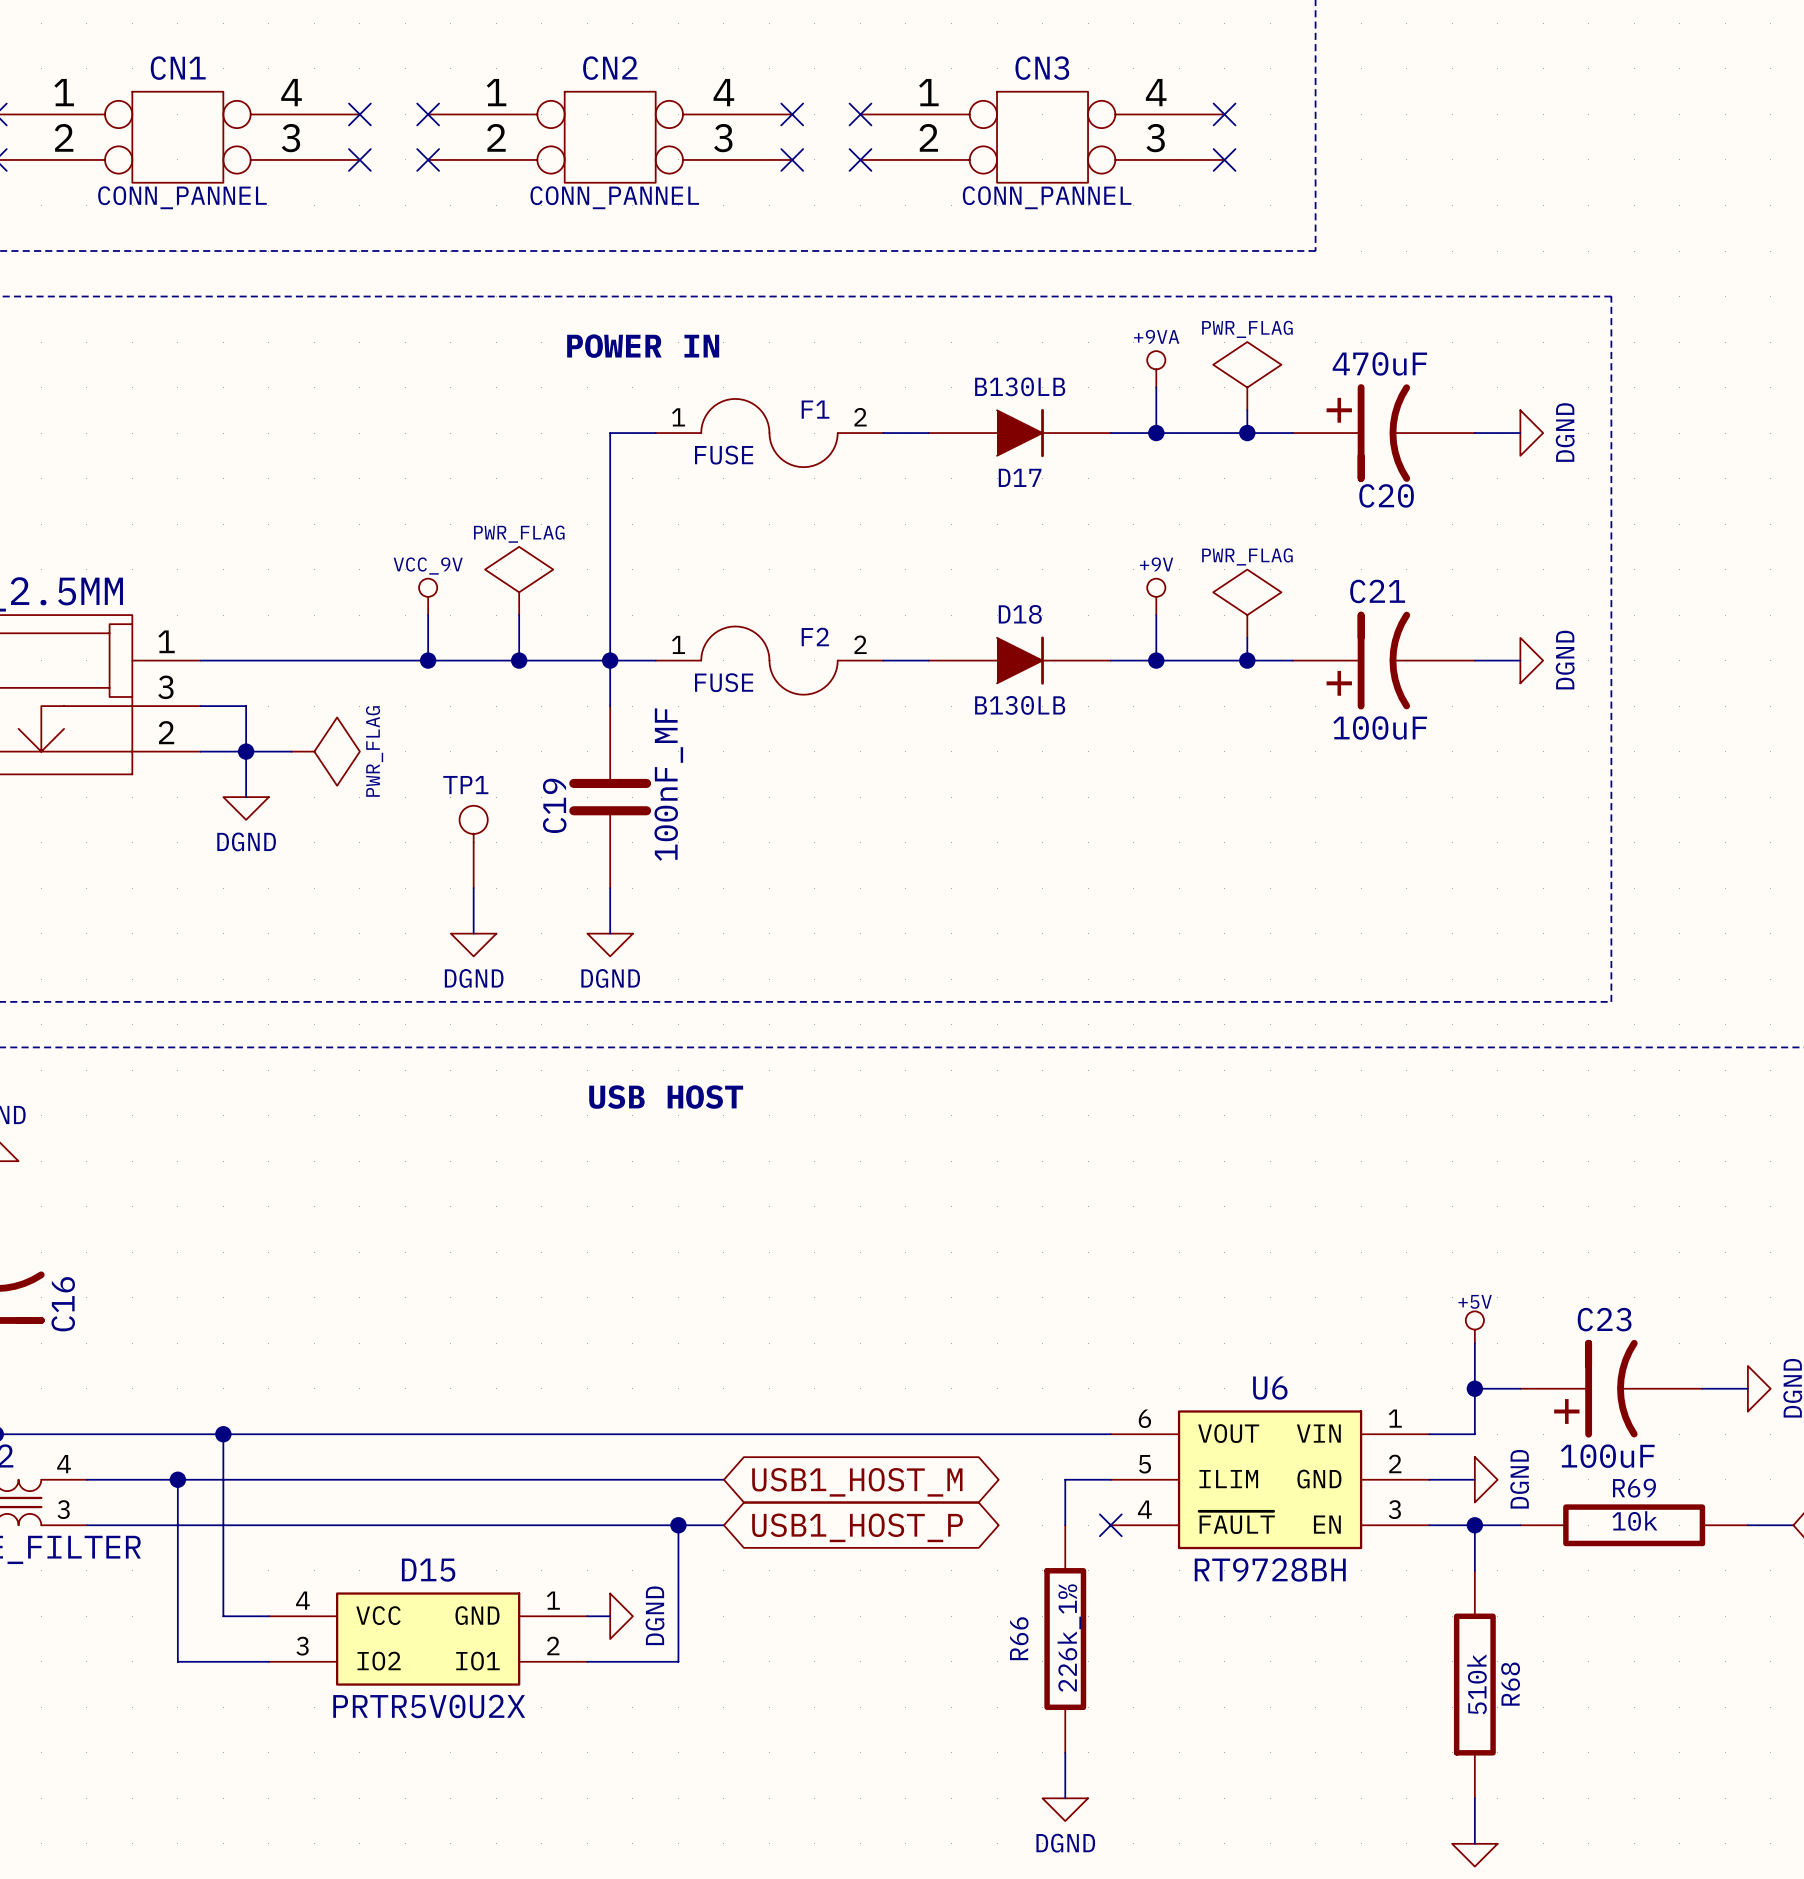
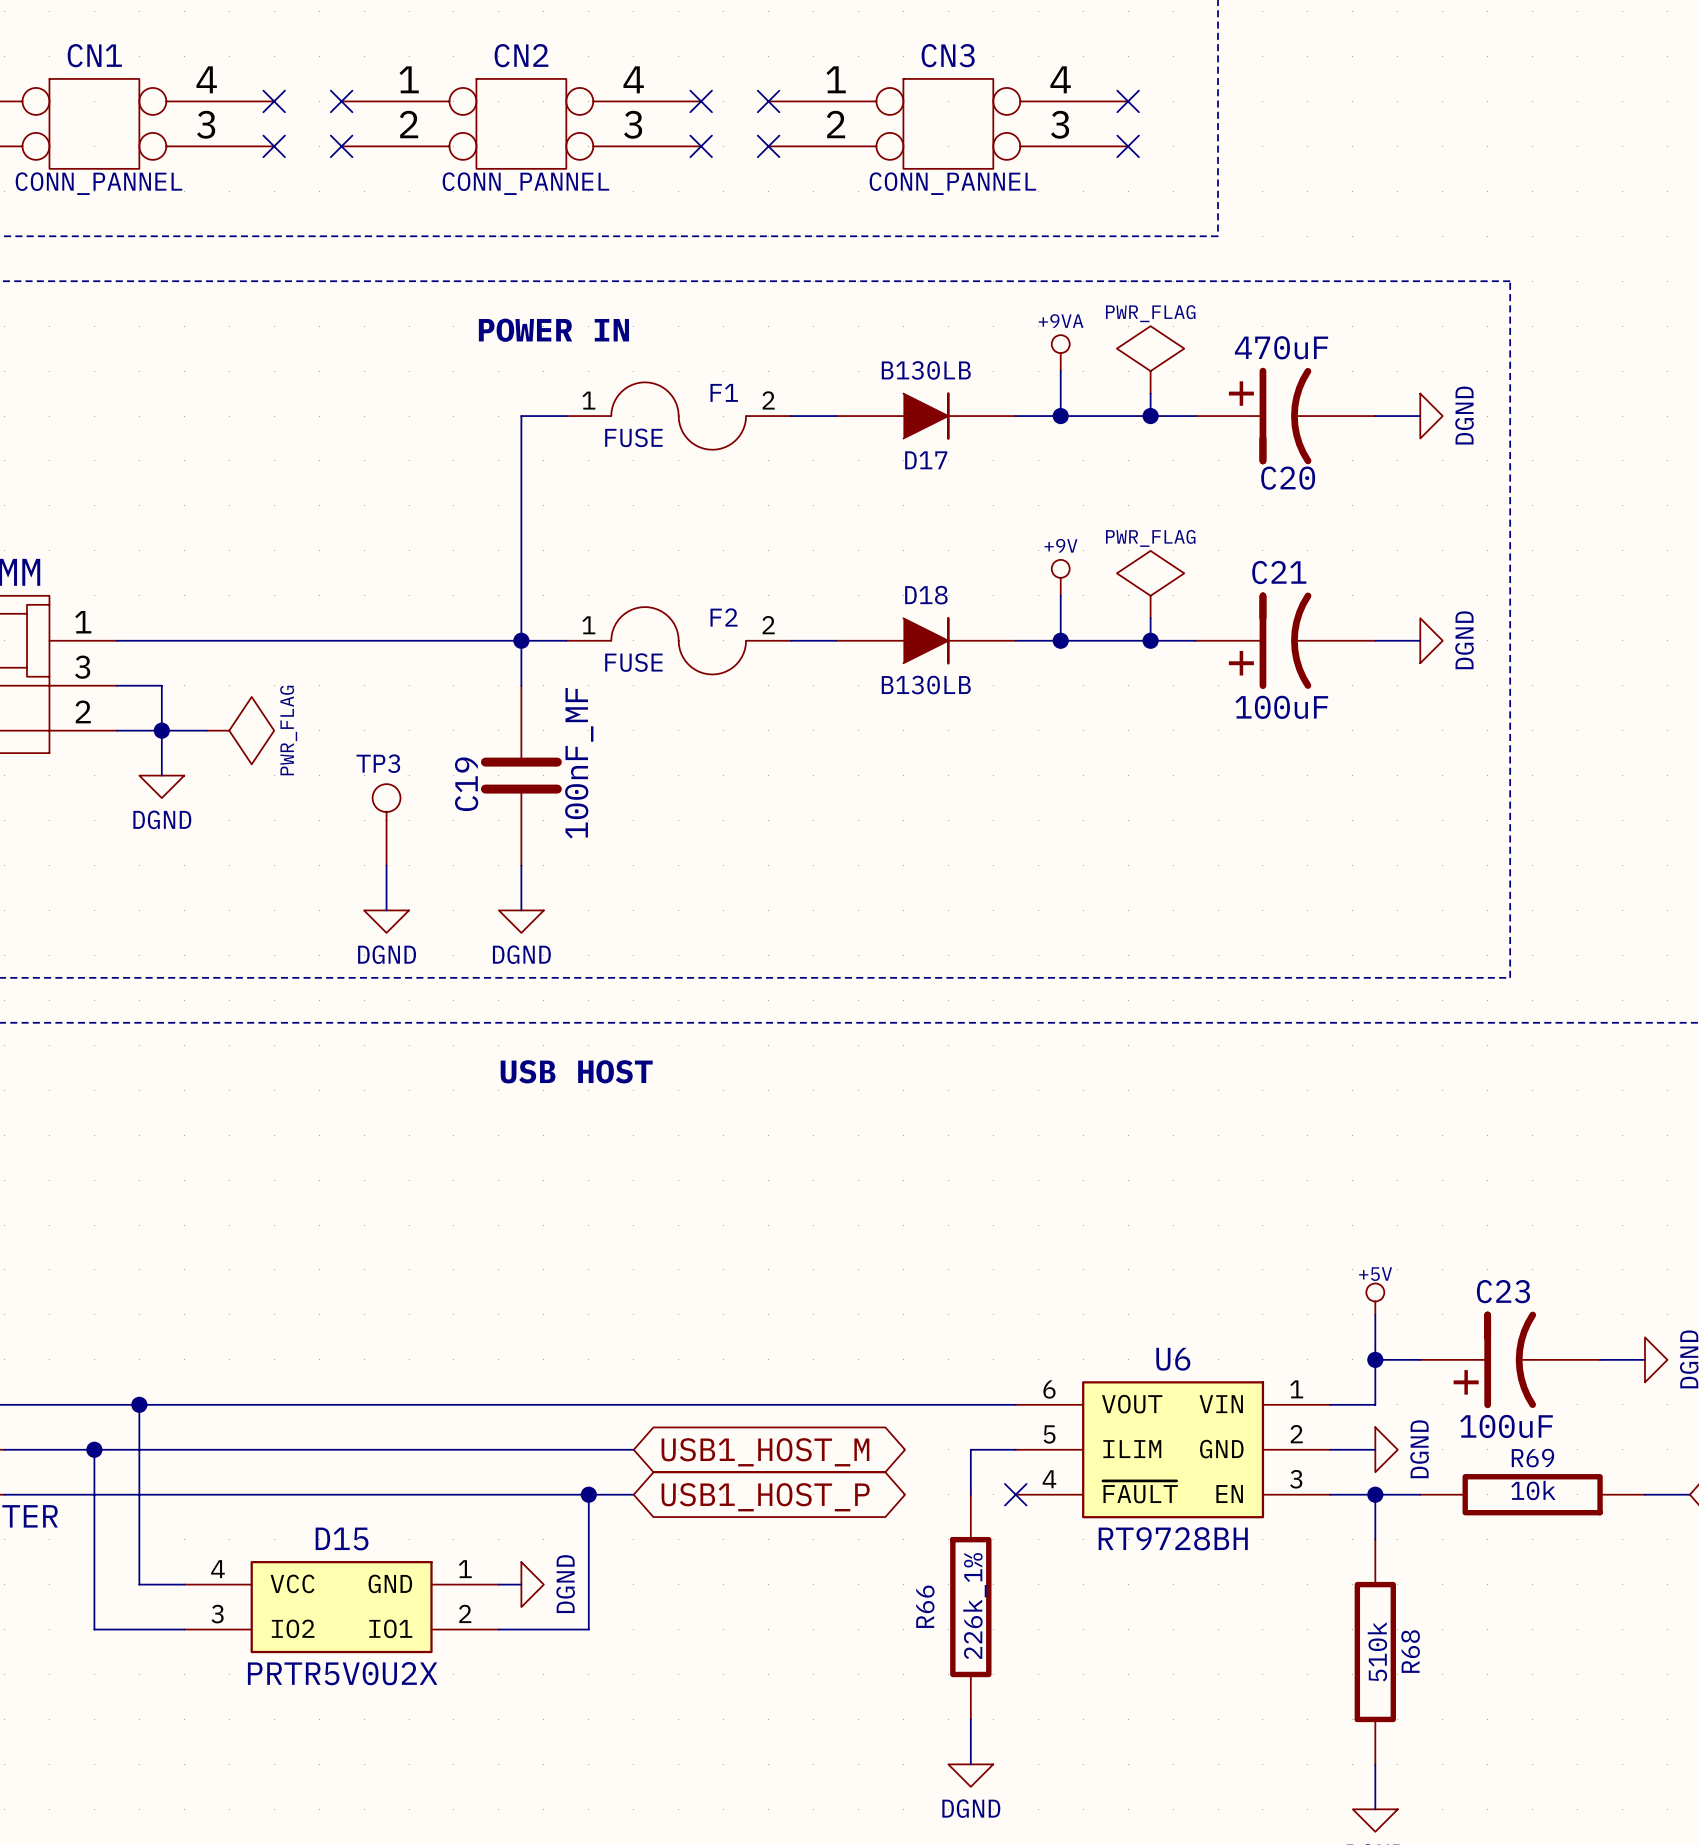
power symbol: PWR_FLAG (519, 580) -> none
power symbol: VCC_9V (428, 596) -> none
wire: (428, 615) (428, 660) -> none
wire: (519, 615) (519, 660) -> none
junction: (428, 660) -> none
junction: (519, 660) -> none
TP1 name: TP1 (465, 785) -> TP3 (378, 763)

